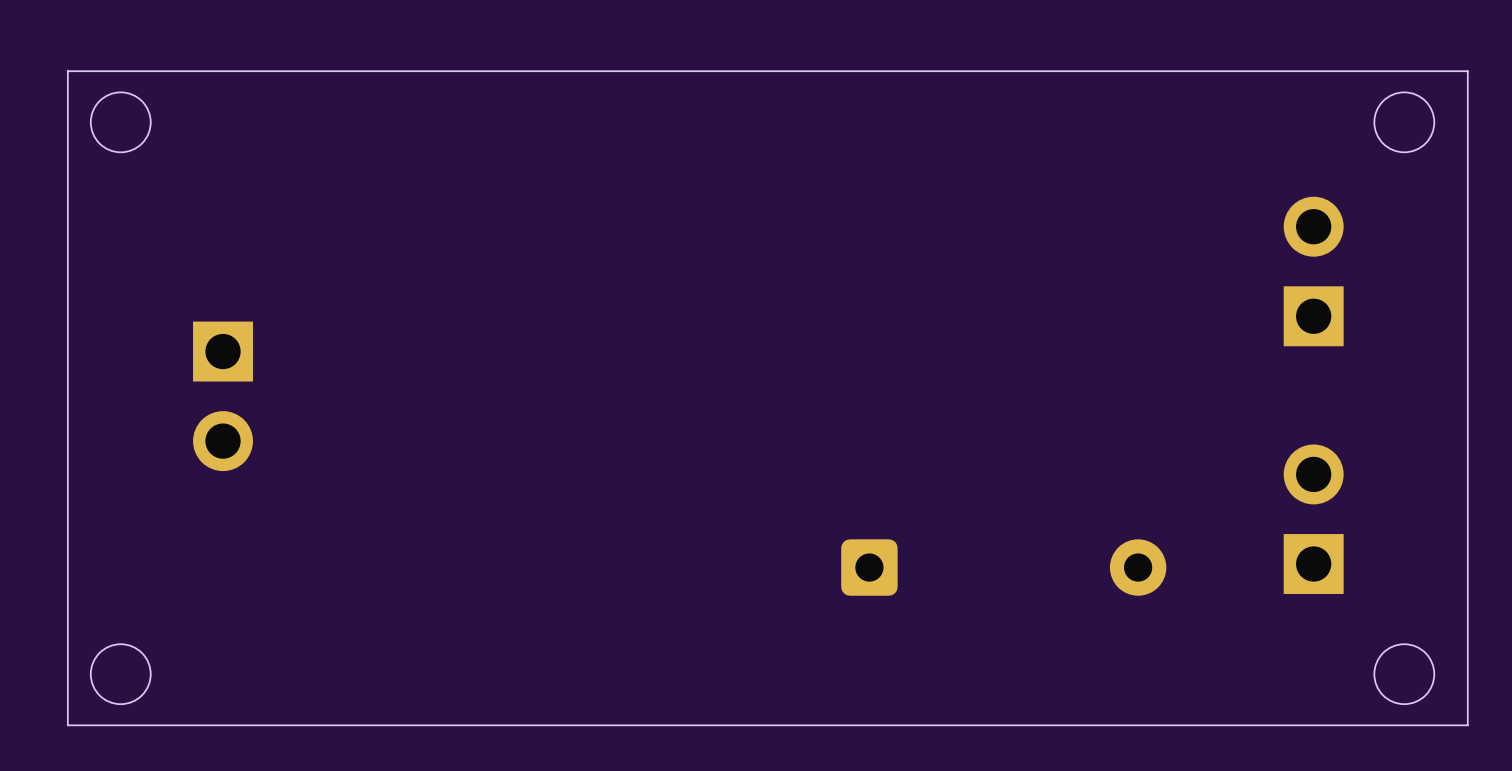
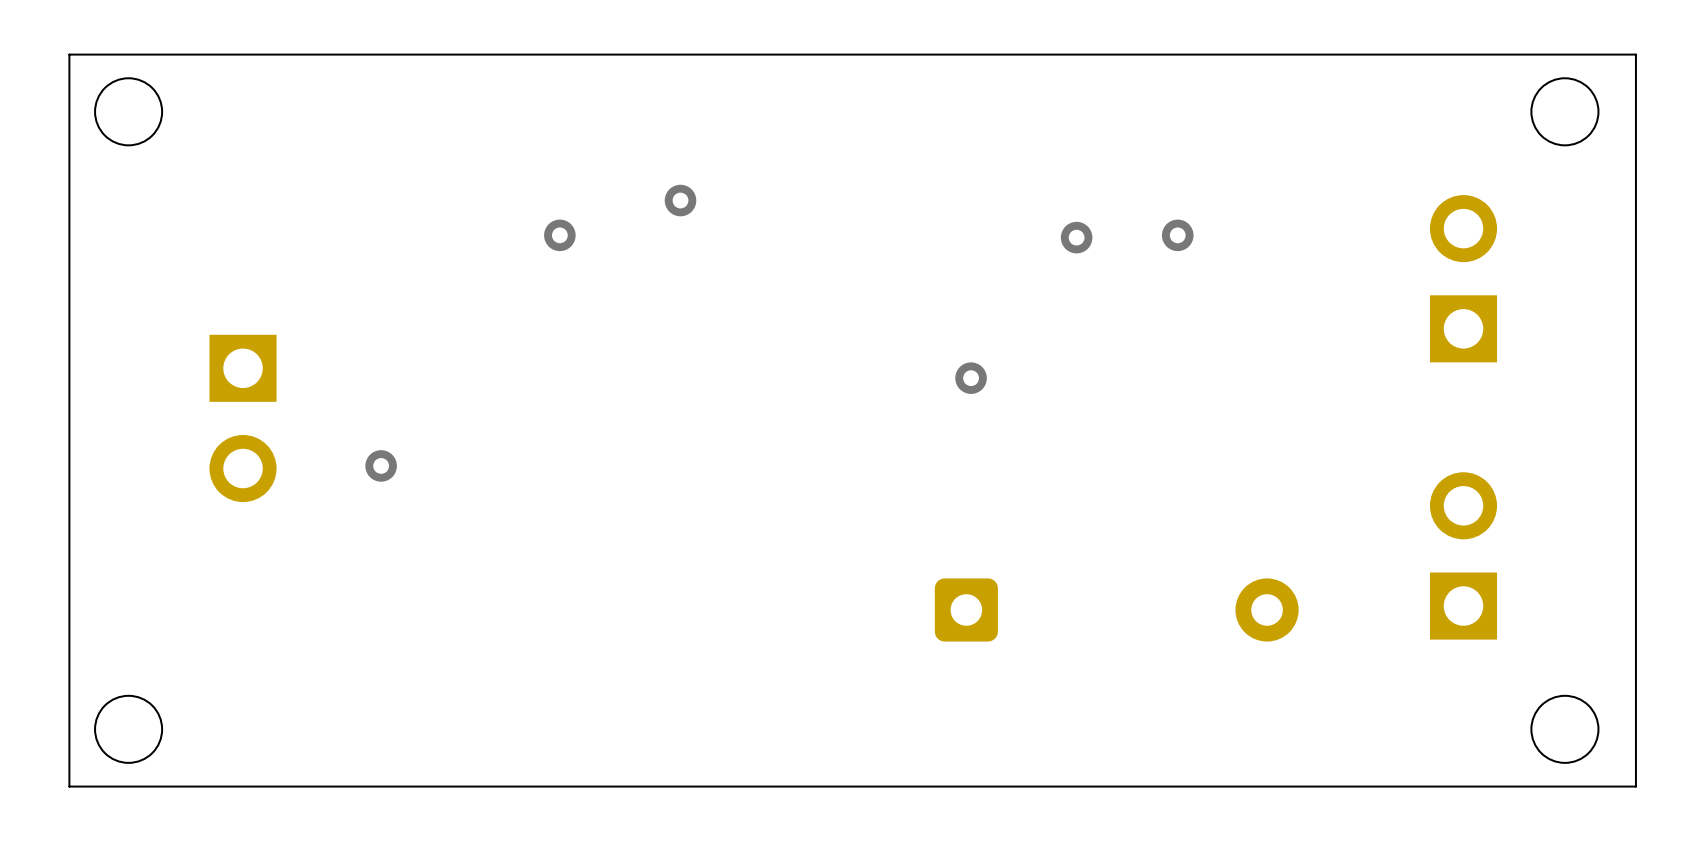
via: none -> (680, 200)
via: none -> (559, 235)
via: none -> (1177, 235)
via: none -> (1076, 237)
via: none -> (971, 378)
via: none -> (381, 465)

